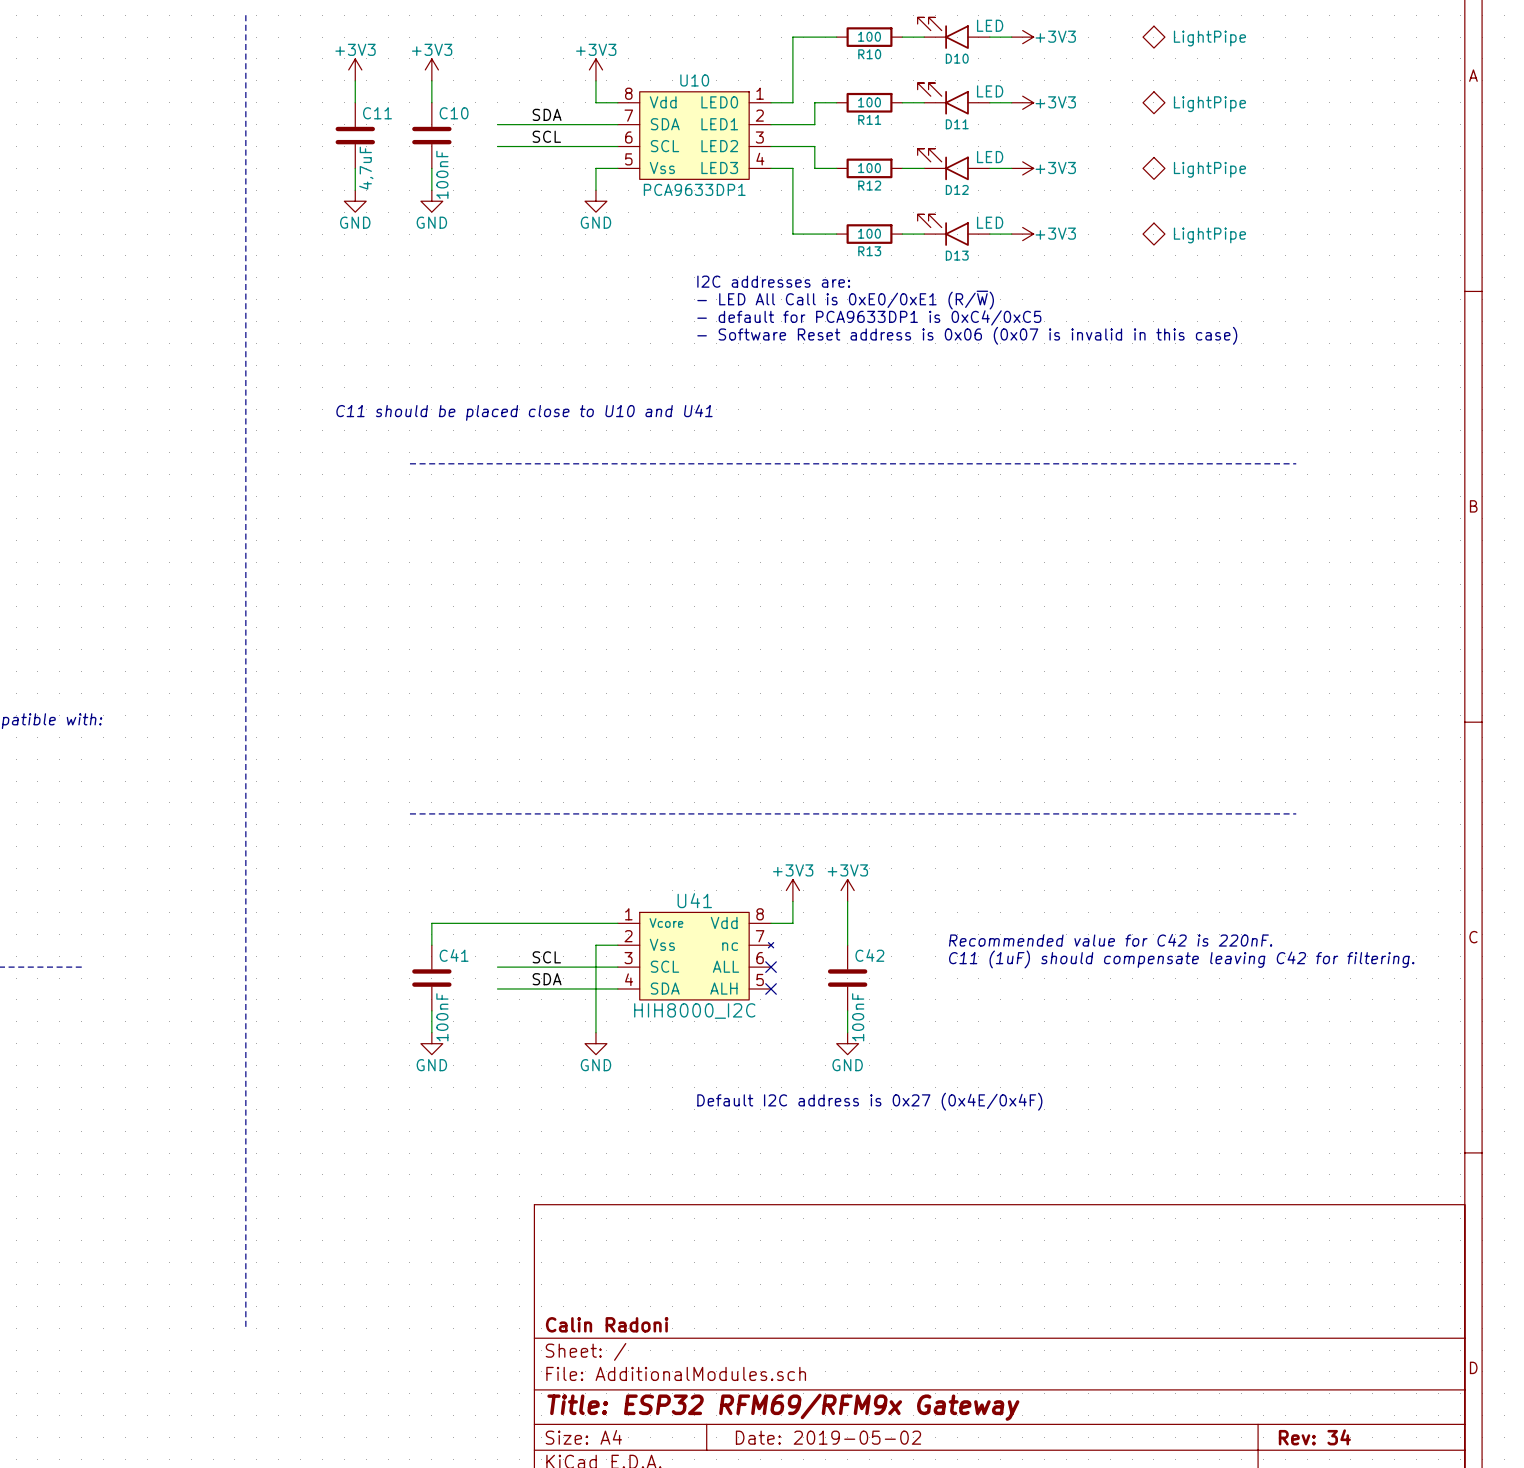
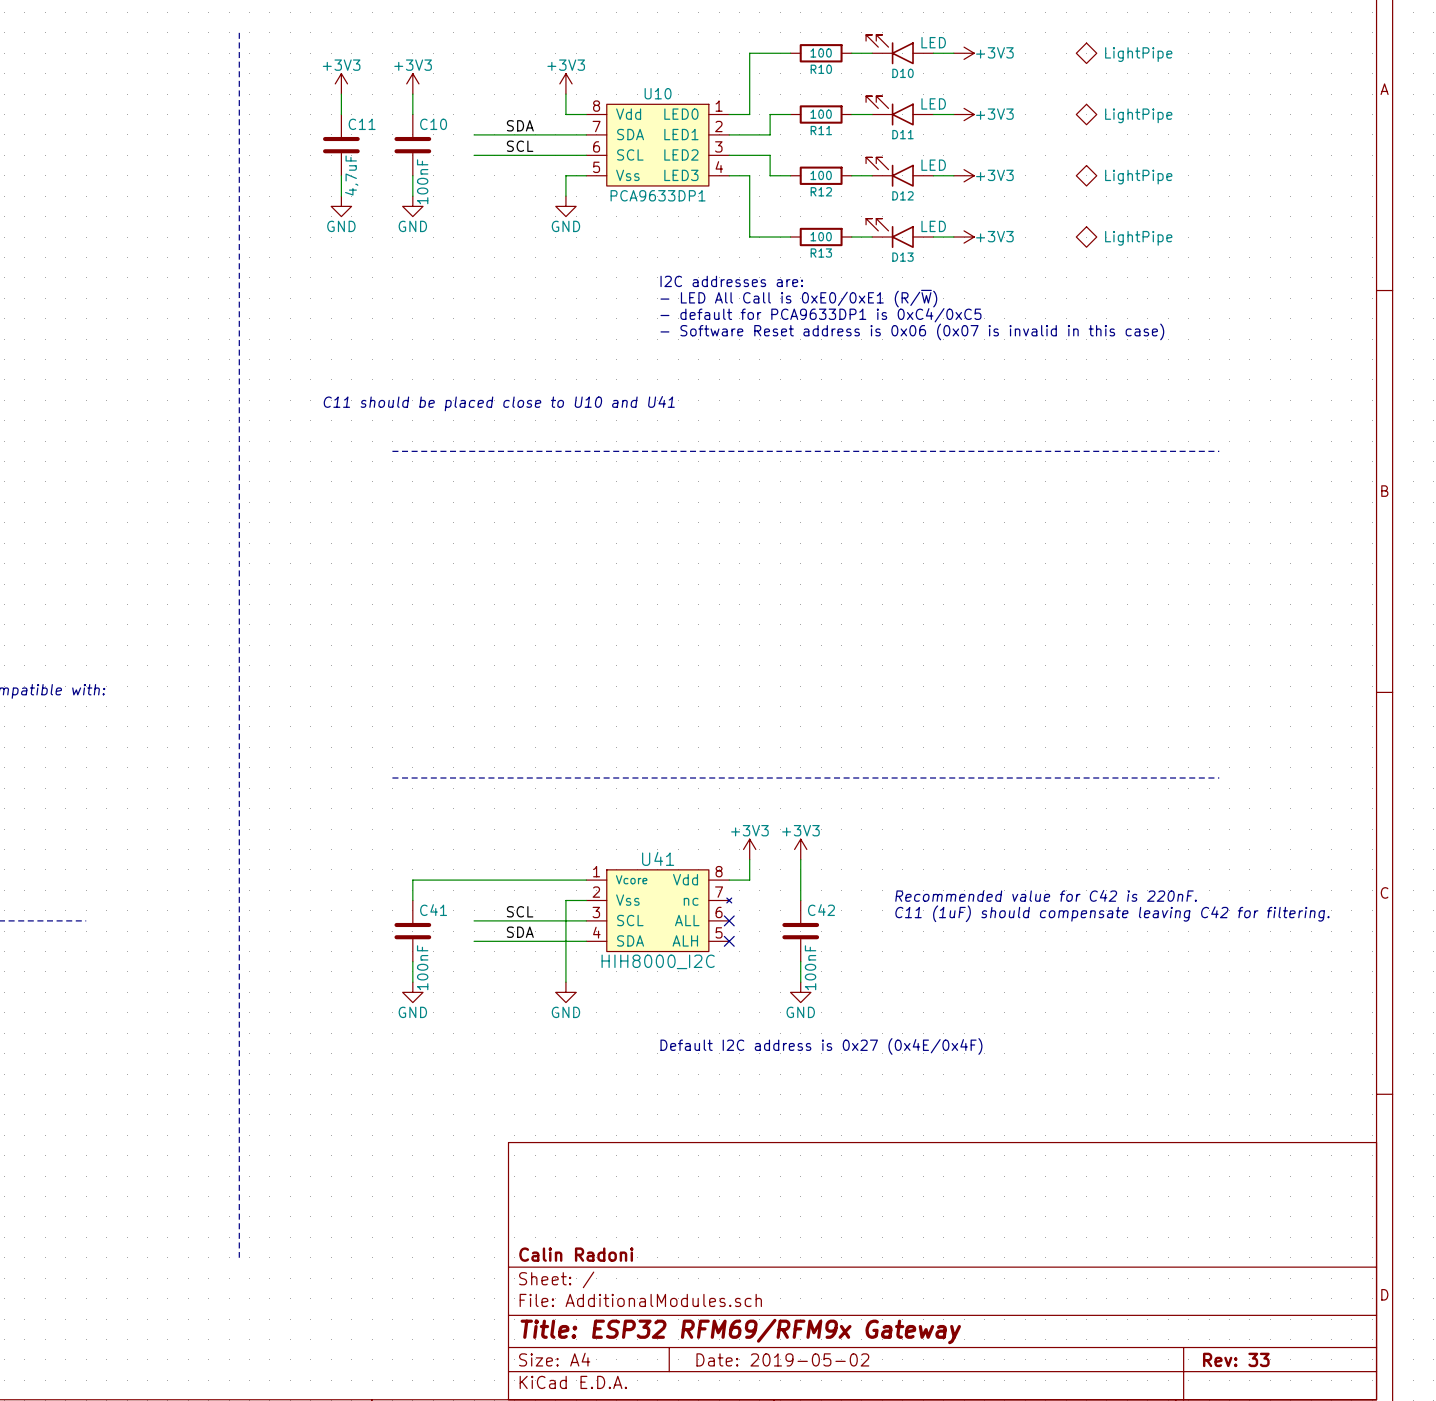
title block: Rev: 34 (1314, 1437) -> Rev: 33 (1236, 1359)

